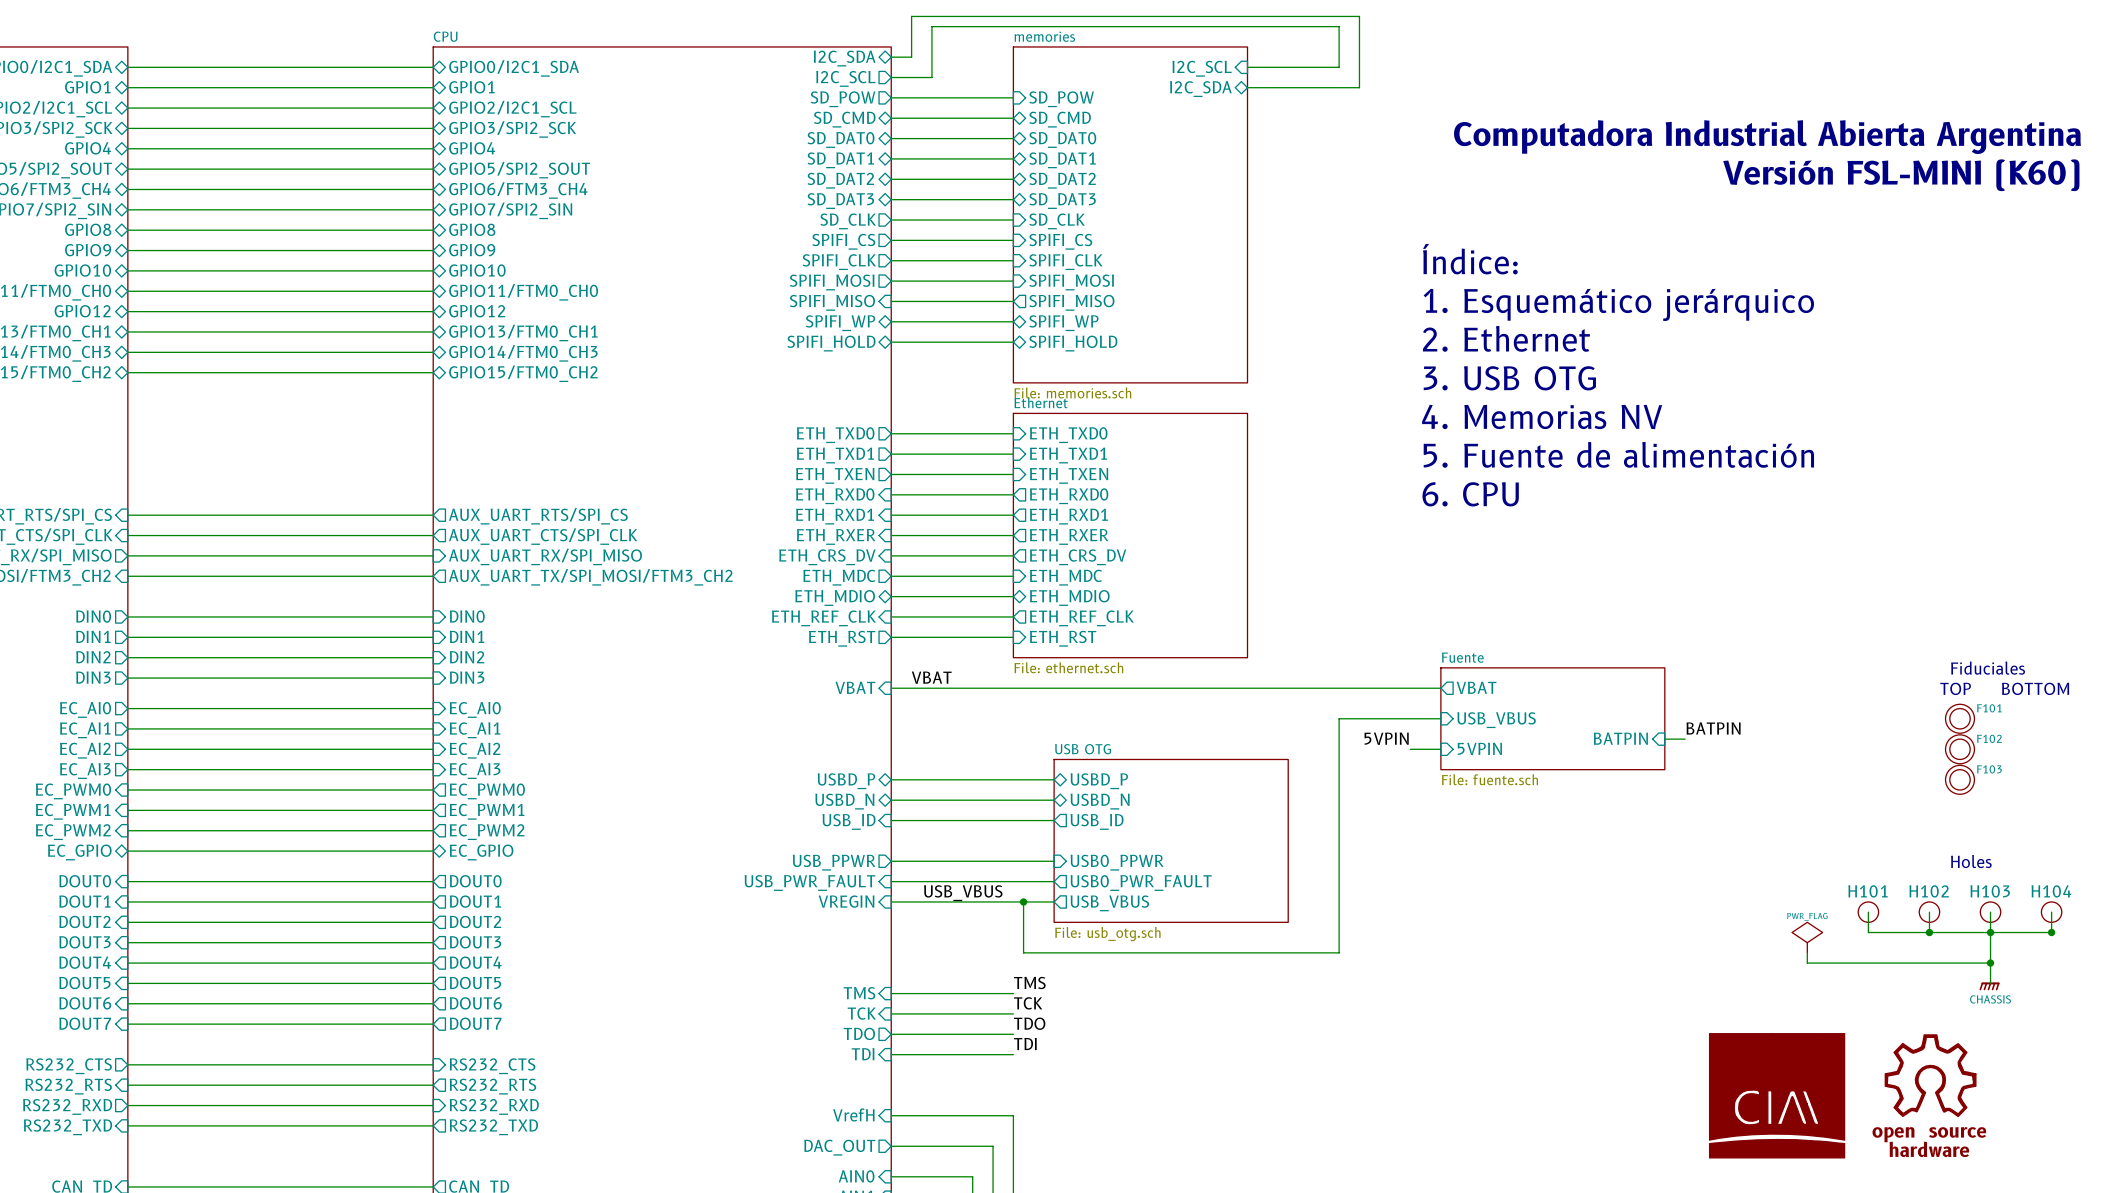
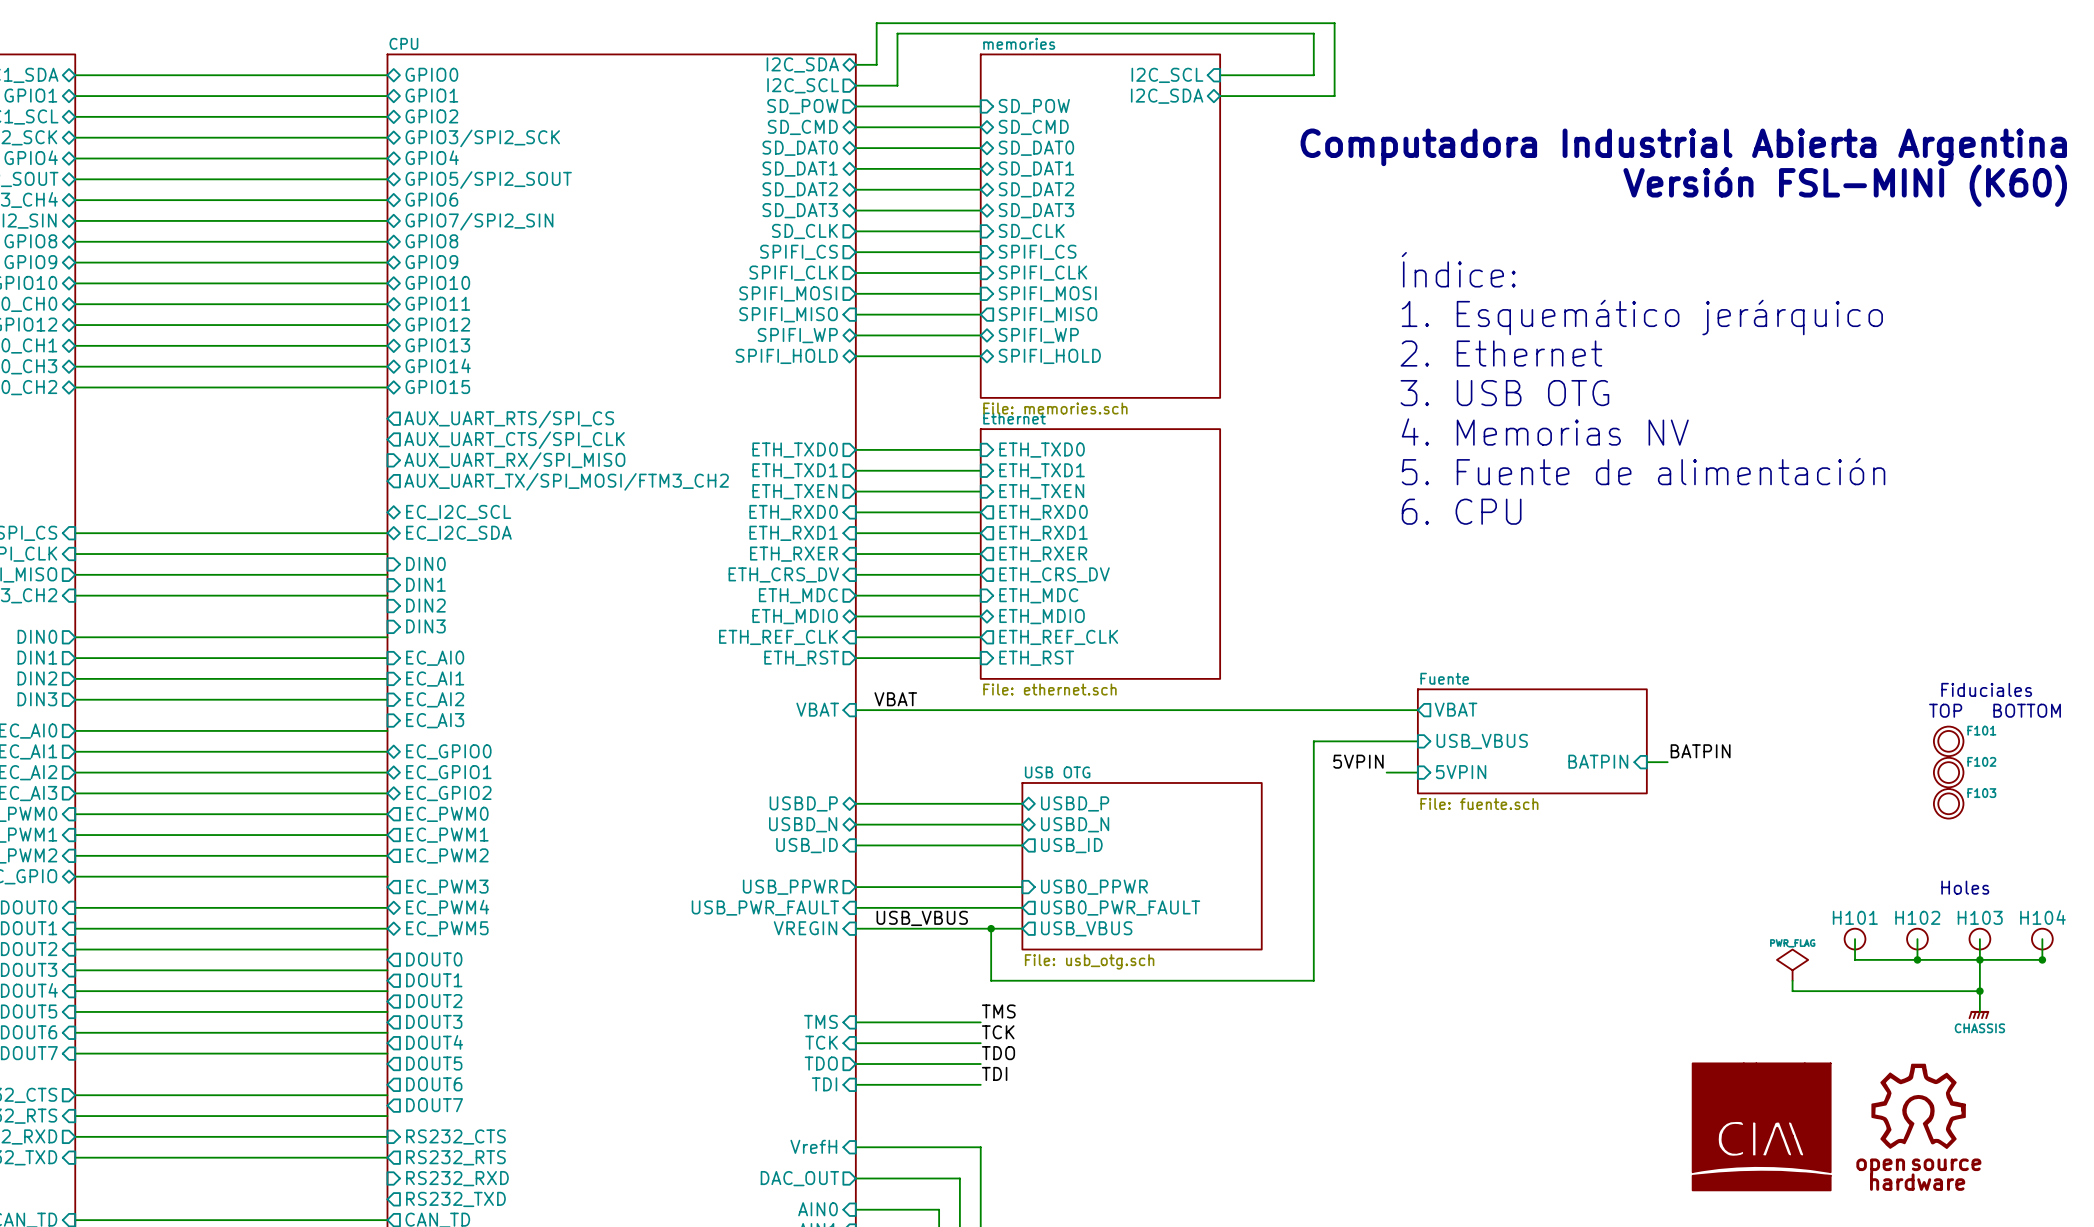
sheet pin: GPIO0/I2C1_SDA (514, 68) -> GPIO0 (431, 74)
sheet pin: GPIO2/I2C1_SCL (512, 109) -> GPIO2 (431, 116)
sheet pin: GPIO6/FTM3_CH4 (518, 190) -> GPIO6 (431, 199)
sheet pin: GPIO11/FTM0_CH0 (523, 292) -> GPIO11 (437, 303)
sheet pin: GPIO13/FTM0_CH1 (523, 333) -> GPIO13 (437, 345)
sheet pin: GPIO14/FTM0_CH3 (523, 353) -> GPIO14 (438, 365)
sheet pin: GPIO15/FTM0_CH2 (523, 373) -> GPIO15 (437, 387)
sheet pin: none -> AUX_UART_RTS/SPI_CS (509, 419)
sheet pin: none -> EC_I2C_SCL (458, 512)
sheet pin shape: output (538, 516) -> bidirectional (458, 533)
sheet pin: AUX_UART_RTS/SPI_CS (538, 516) -> EC_I2C_SDA (458, 533)
sheet pin position: AUX_UART_CTS/SPI_CLK (543, 536) -> AUX_UART_CTS/SPI_CLK (514, 440)
sheet pin position: AUX_UART_RX/SPI_MISO (545, 556) -> AUX_UART_RX/SPI_MISO (514, 461)
sheet pin: none -> DIN1 (425, 584)
sheet pin position: AUX_UART_TX/SPI_MOSI/FTM3_CH2 (590, 577) -> AUX_UART_TX/SPI_MOSI/FTM3_CH2 (566, 481)
sheet pin: none -> DIN2 (425, 605)
sheet pin: none -> DIN3 (425, 626)
sheet pin position: DIN0 (467, 616) -> DIN0 (425, 563)
sheet pin: DIN1 (467, 636) -> EC_AI0 (435, 658)
sheet pin: DIN2 (467, 657) -> EC_AI1 (435, 679)
sheet pin: DIN3 (467, 677) -> EC_AI2 (435, 699)
sheet pin: EC_AI0 (475, 709) -> EC_AI3 (435, 720)
sheet pin shape: input (475, 730) -> bidirectional (448, 751)
sheet pin: EC_AI1 (475, 730) -> EC_GPIO0 (448, 751)
sheet pin shape: input (475, 750) -> bidirectional (448, 772)
sheet pin: EC_AI2 (475, 750) -> EC_GPIO1 (448, 772)
sheet pin shape: input (475, 771) -> bidirectional (448, 793)
sheet pin: EC_AI3 (475, 771) -> EC_GPIO2 (448, 793)
sheet pin: EC_GPIO (481, 852) -> none
sheet pin: none -> EC_PWM3 (447, 887)
sheet pin shape: output (475, 881) -> bidirectional (447, 907)
sheet pin: DOUT0 (475, 881) -> EC_PWM4 (447, 907)
sheet pin shape: output (475, 901) -> bidirectional (447, 928)
sheet pin: DOUT1 (475, 901) -> EC_PWM5 (447, 928)
sheet pin position: DOUT2 (475, 921) -> DOUT2 (434, 1001)
sheet pin: none -> DOUT0 (434, 959)
sheet pin position: DOUT3 (475, 942) -> DOUT3 (434, 1021)
sheet pin: none -> DOUT1 (434, 980)
sheet pin position: DOUT4 (475, 962) -> DOUT4 (434, 1042)
sheet pin position: DOUT5 (475, 983) -> DOUT5 (434, 1063)
sheet pin position: DOUT6 (475, 1003) -> DOUT6 (434, 1084)
sheet pin position: DOUT7 (475, 1023) -> DOUT7 (434, 1105)
sheet pin: RS232_CTS (492, 1066) -> none
sheet pin: RS232_RTS (492, 1086) -> none
sheet pin: RS232_RXD (494, 1106) -> RS232_CTS (455, 1136)
sheet pin: RS232_TXD (493, 1127) -> RS232_RTS (455, 1157)
sheet pin: none -> RS232_RXD (457, 1178)
sheet pin: none -> RS232_TXD (455, 1199)

